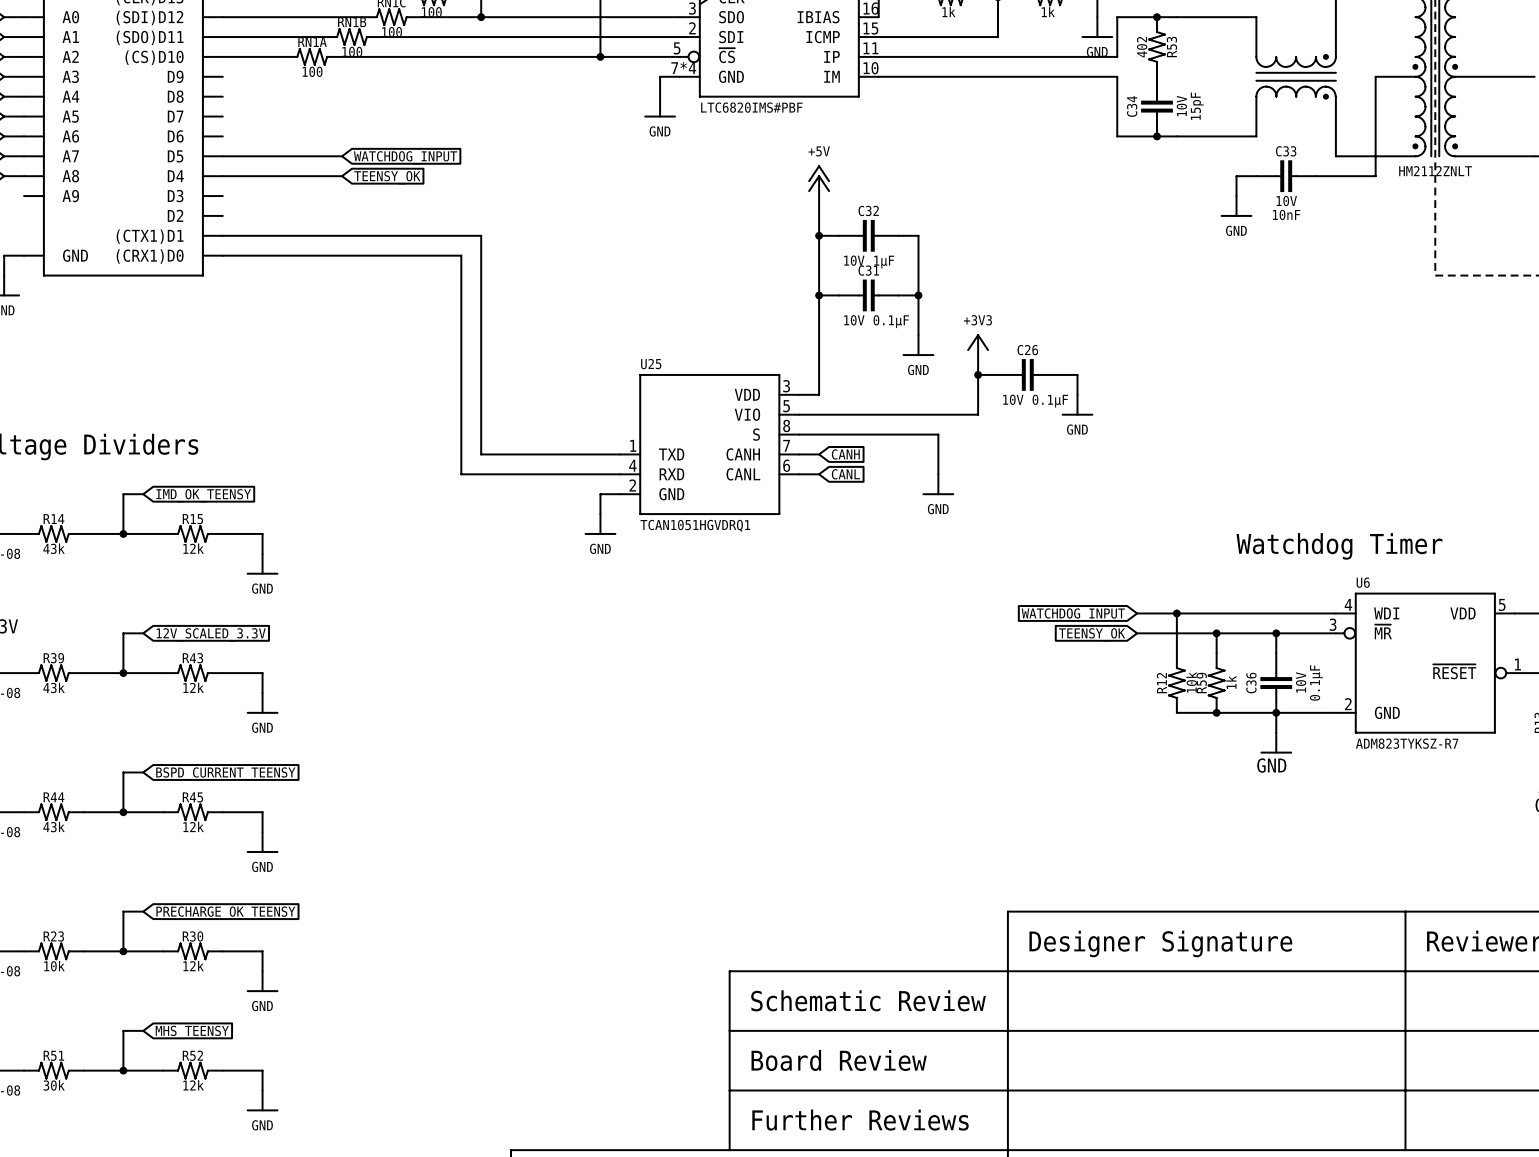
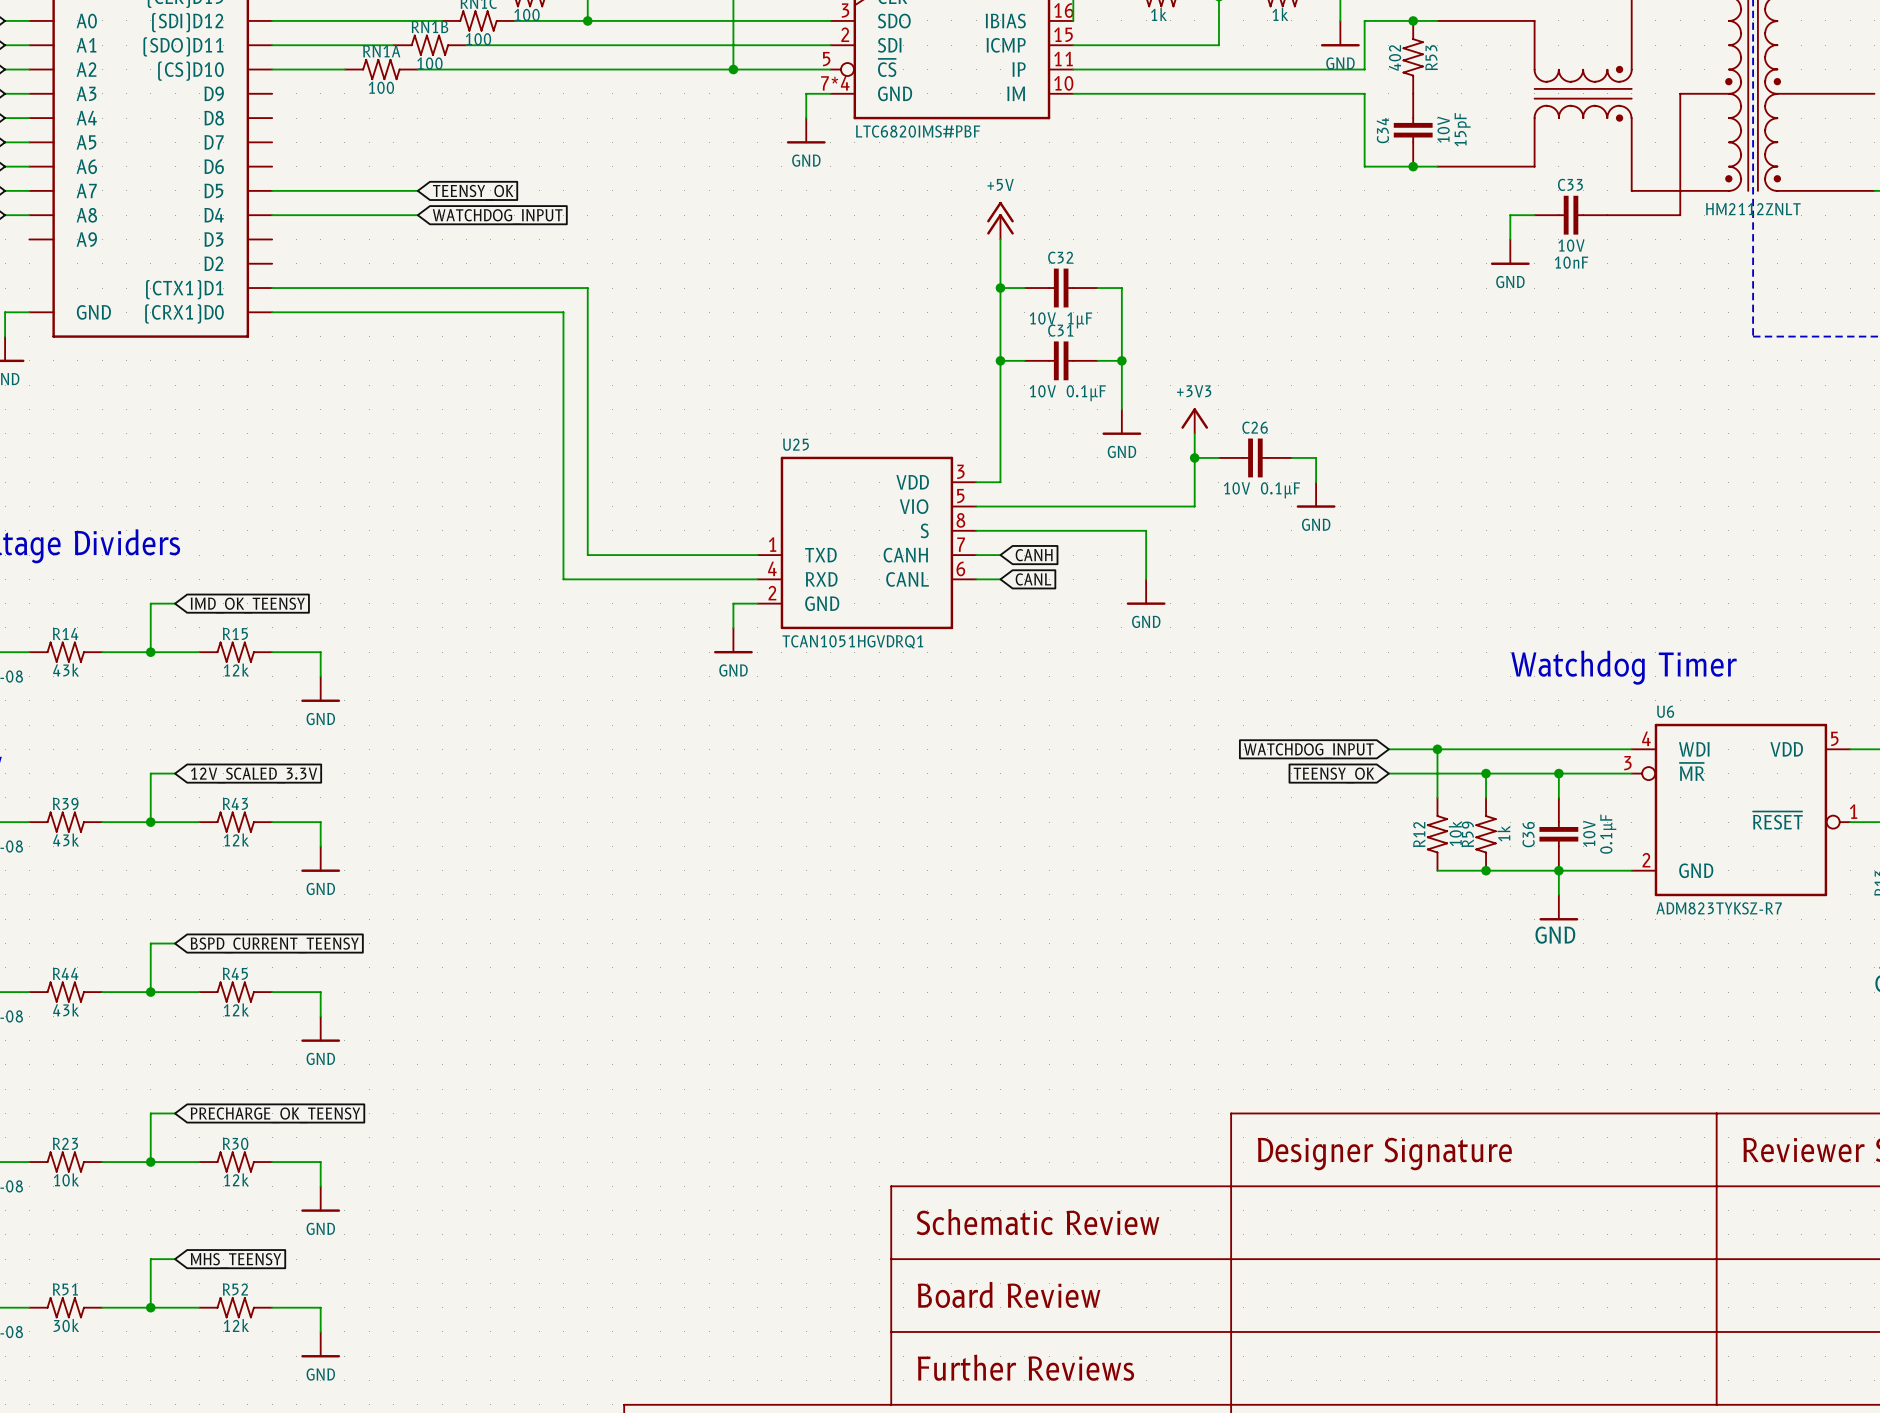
global label: WATCHDOG_INPUT (405, 157) -> TEENSY_OK (473, 192)
global label: TEENSY_OK (387, 177) -> WATCHDOG_INPUT (497, 217)

